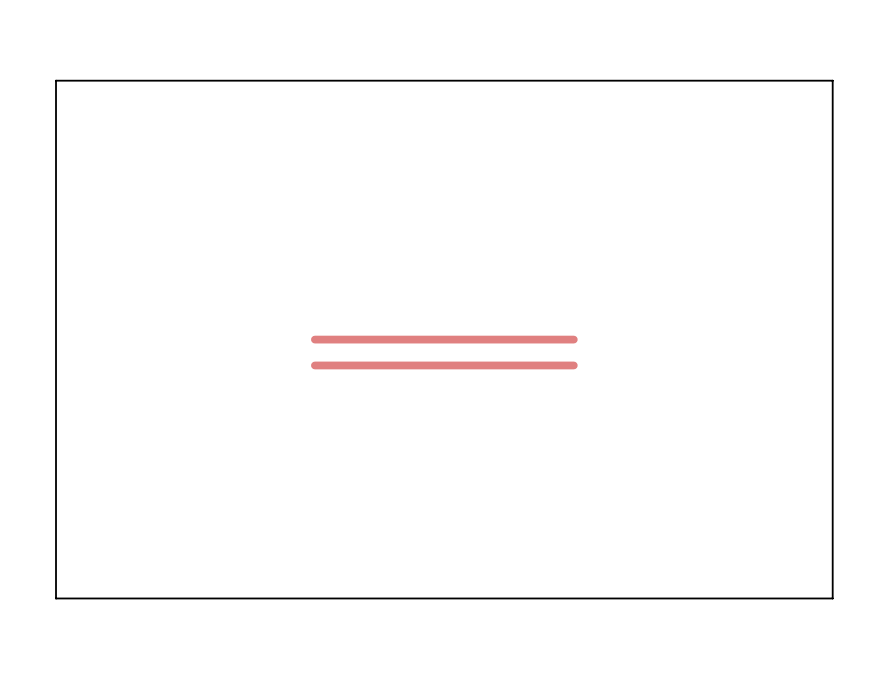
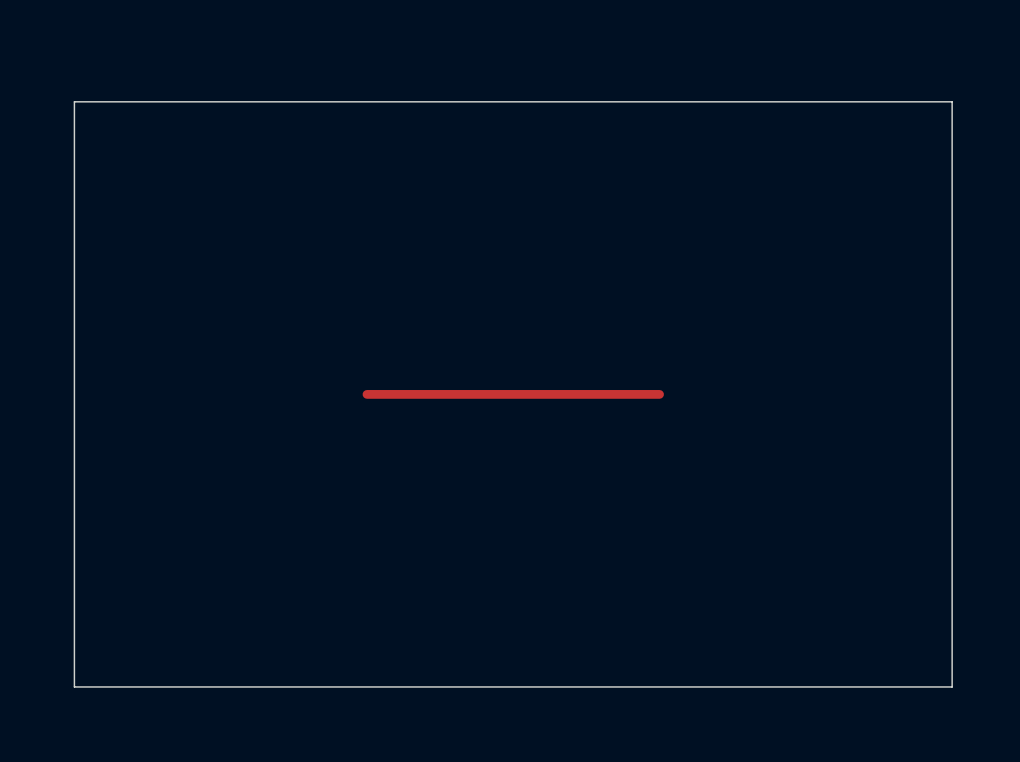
track: (314, 365) (573, 365) -> none

